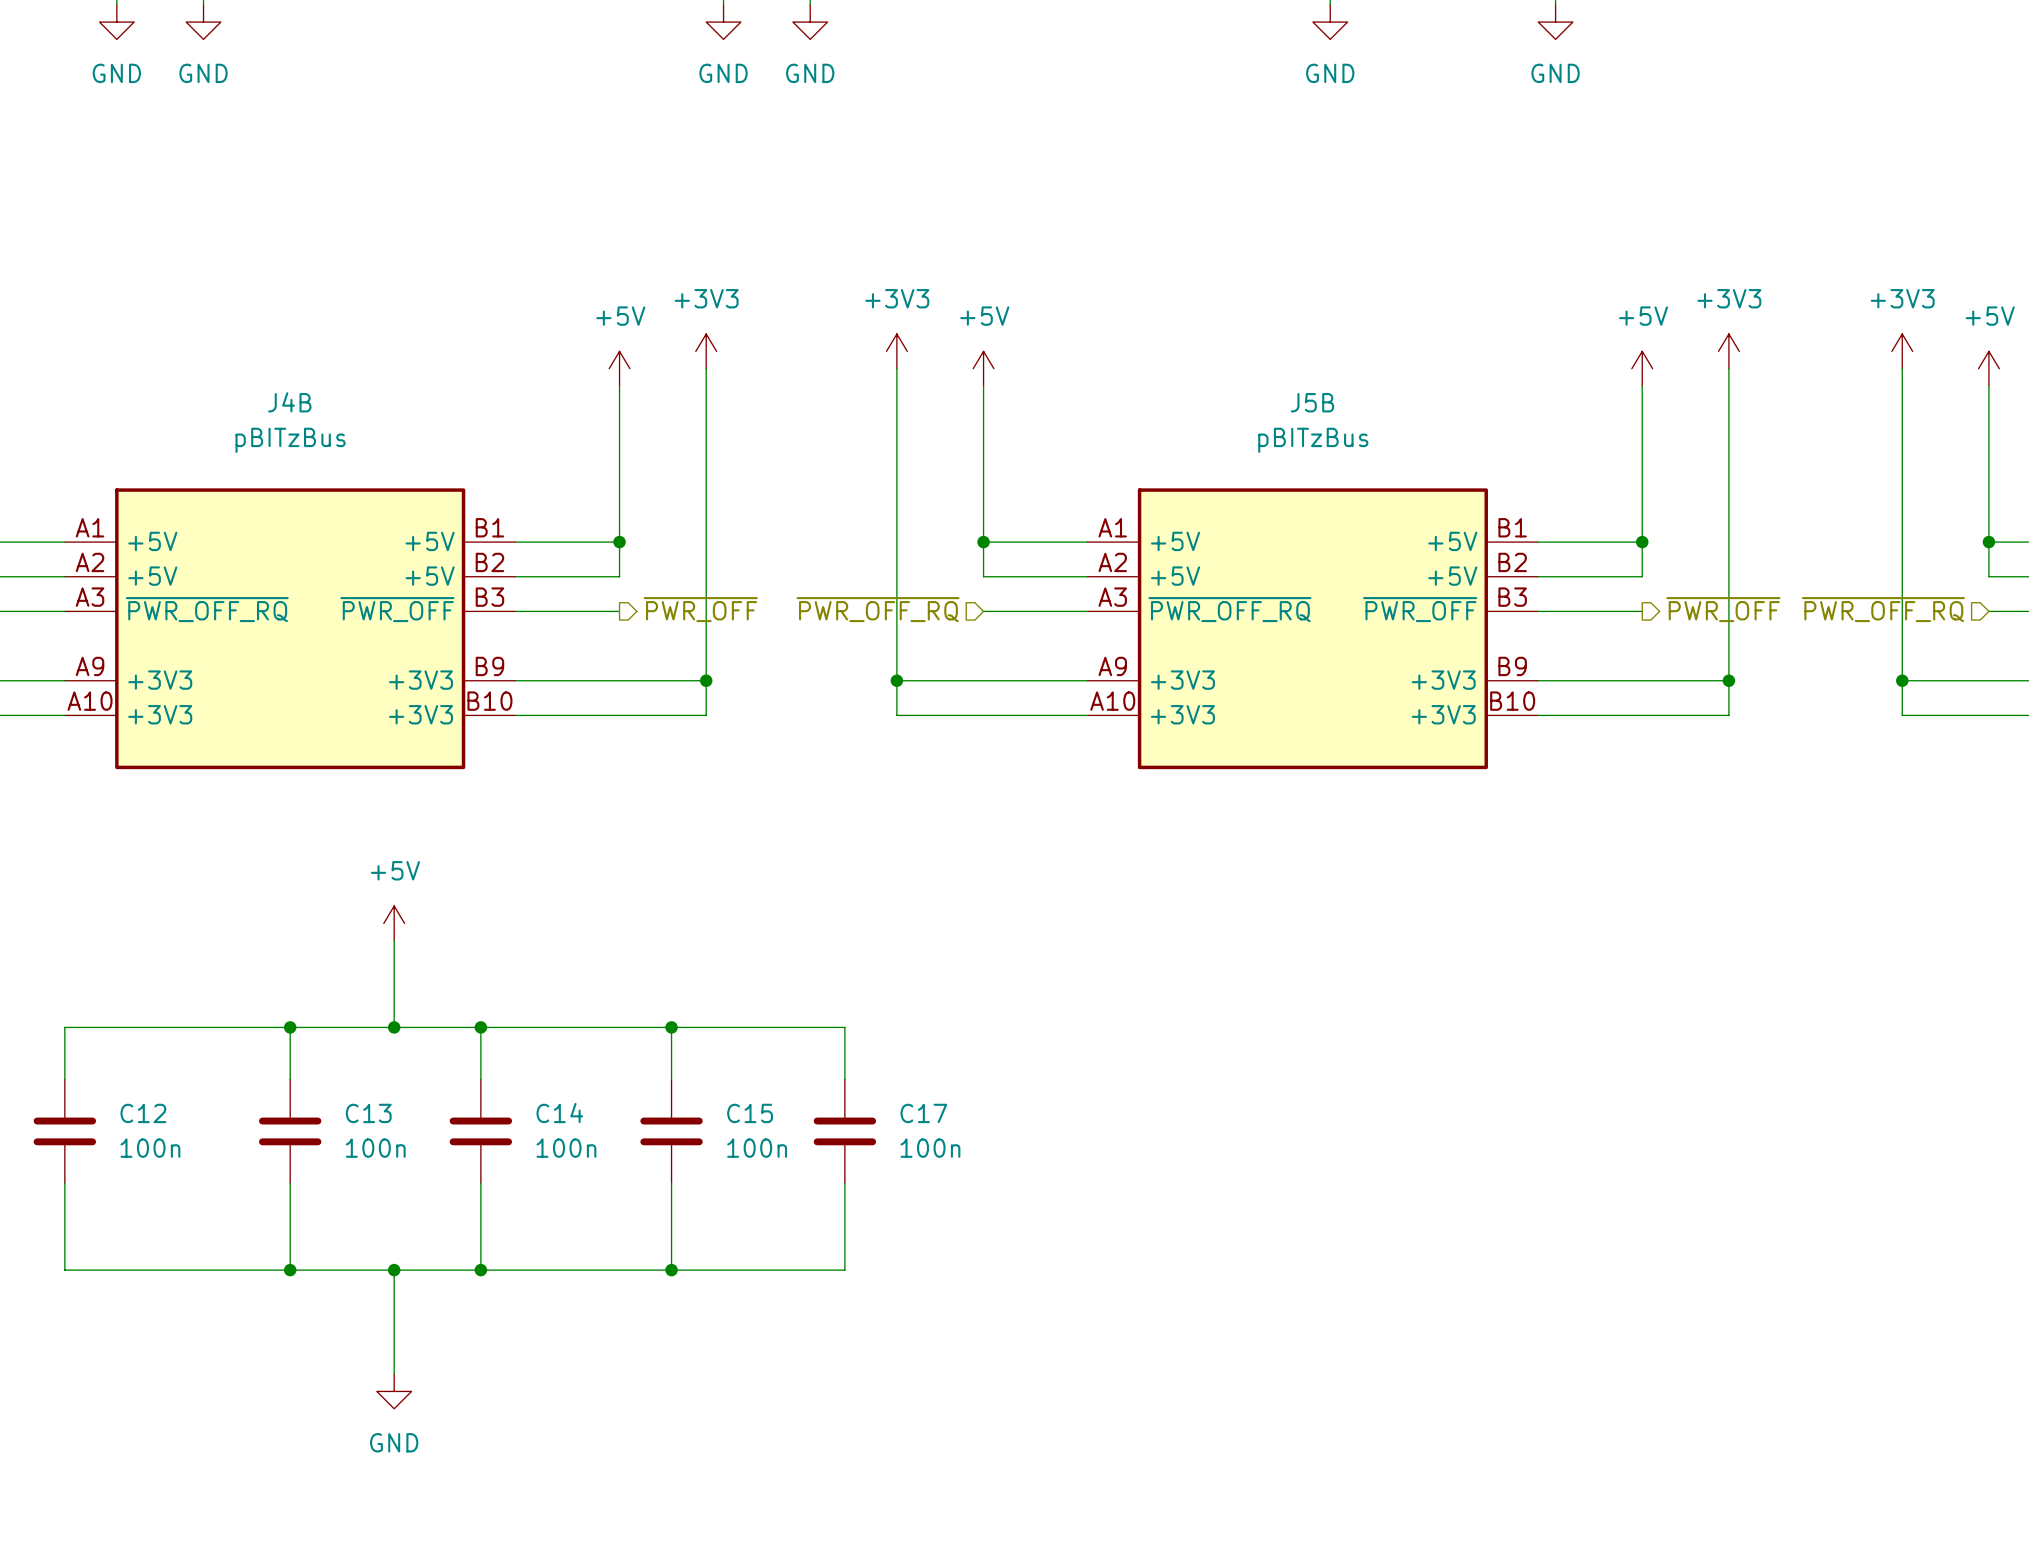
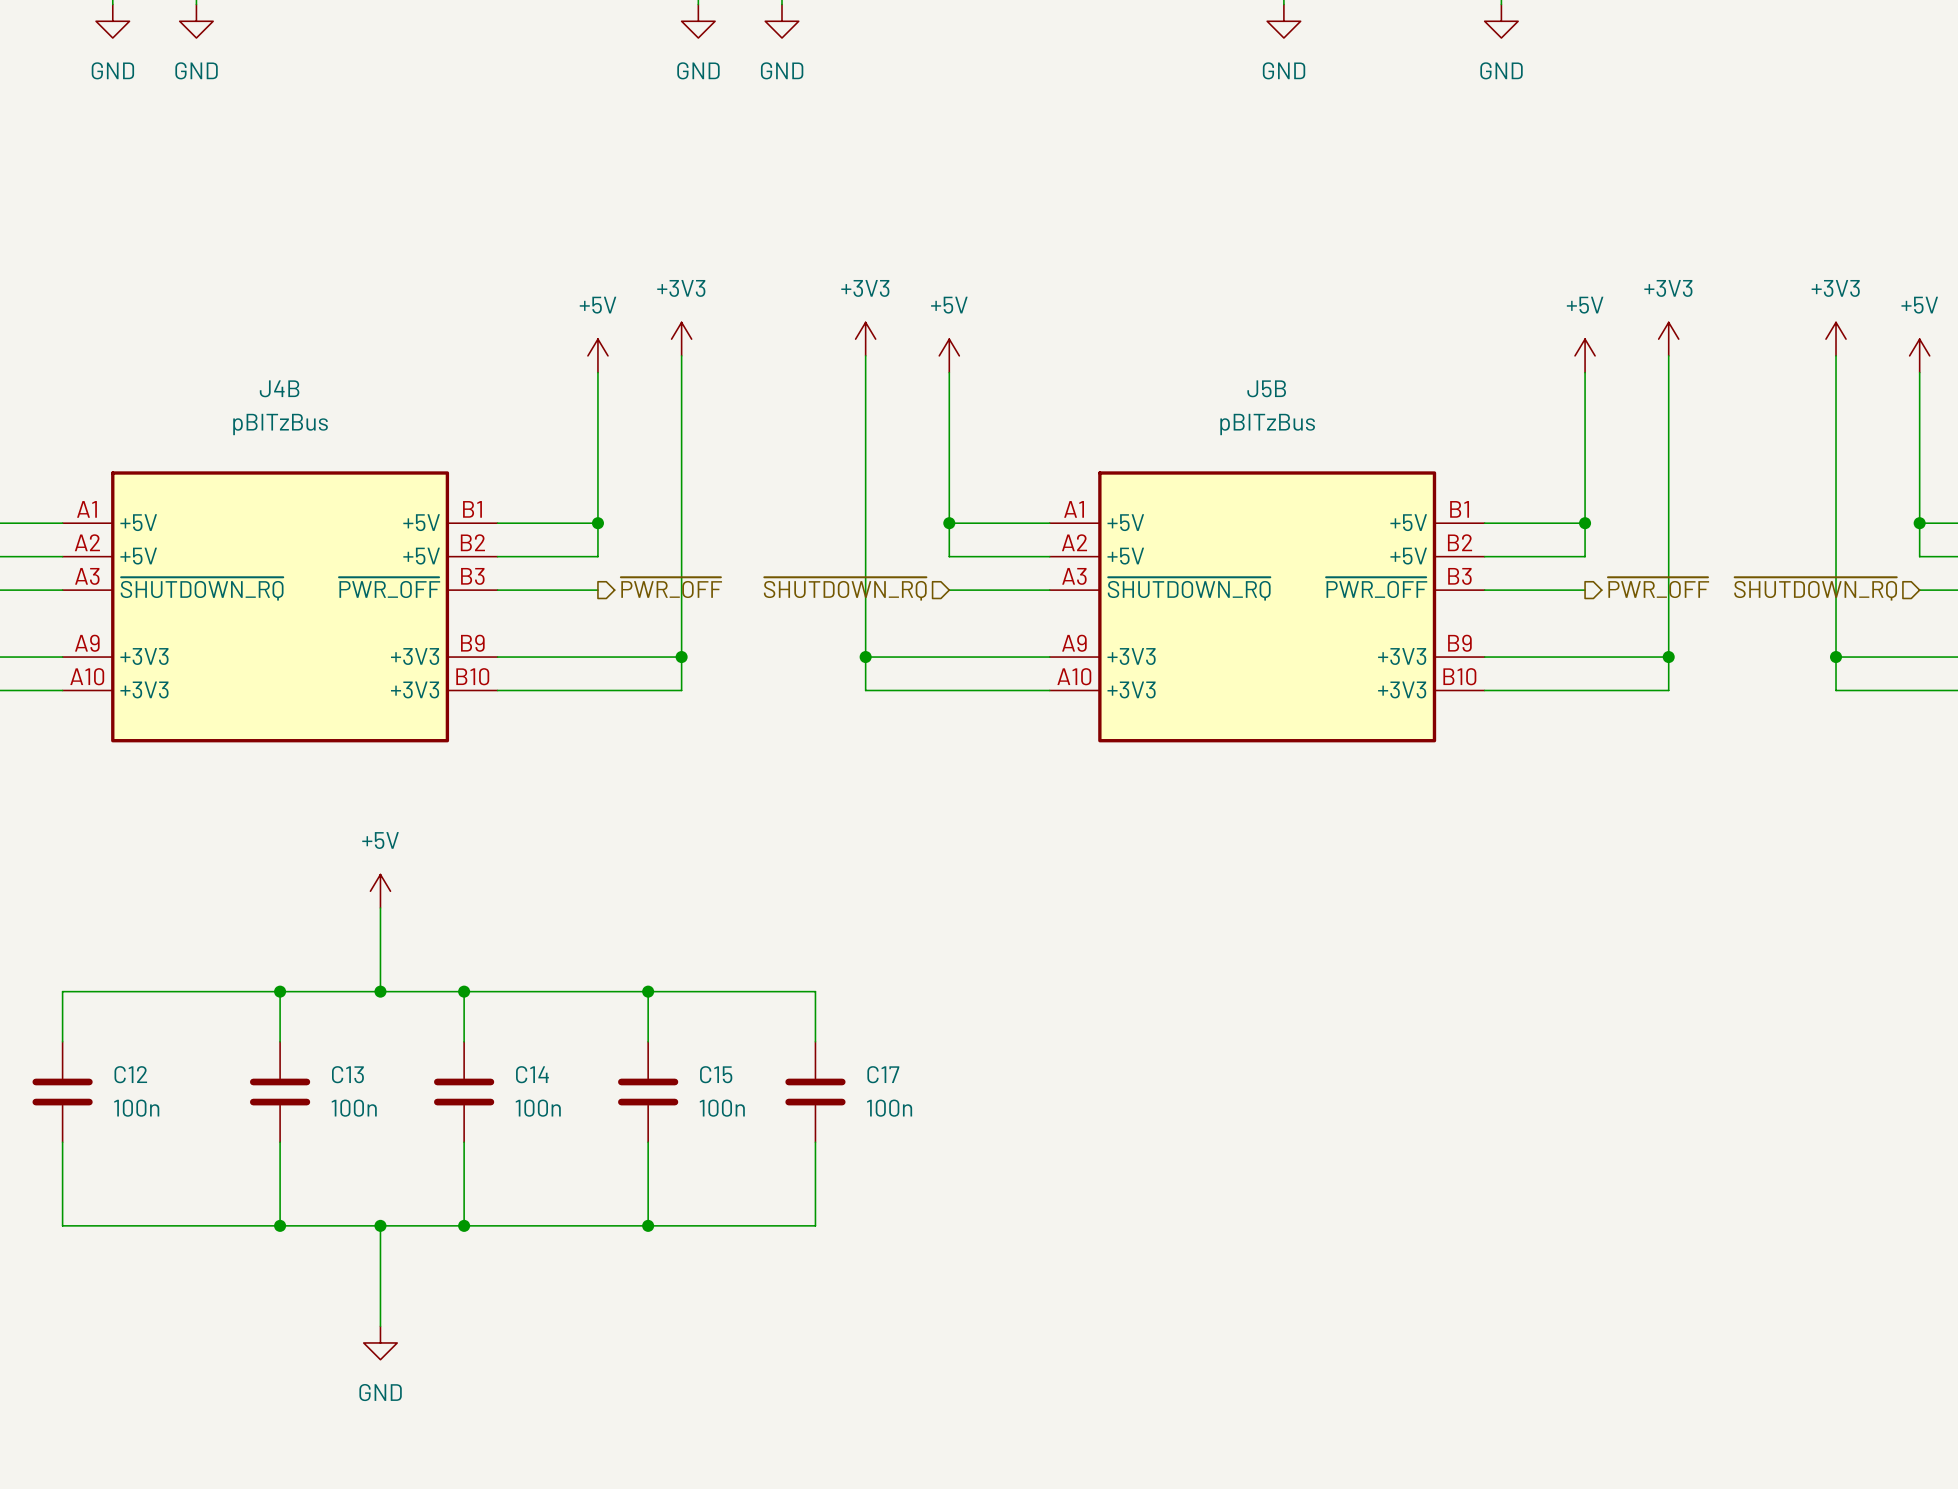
J4B pin name: ~{PWR_OFF_RQ} (207, 609) -> ~{SHUTDOWN_RQ} (202, 588)
hierarchical label: ~{PWR_OFF_RQ} (878, 609) -> ~{SHUTDOWN_RQ} (845, 588)
J5B pin name: ~{PWR_OFF_RQ} (1229, 609) -> ~{SHUTDOWN_RQ} (1189, 588)
hierarchical label: ~{PWR_OFF_RQ} (1883, 609) -> ~{SHUTDOWN_RQ} (1815, 588)

